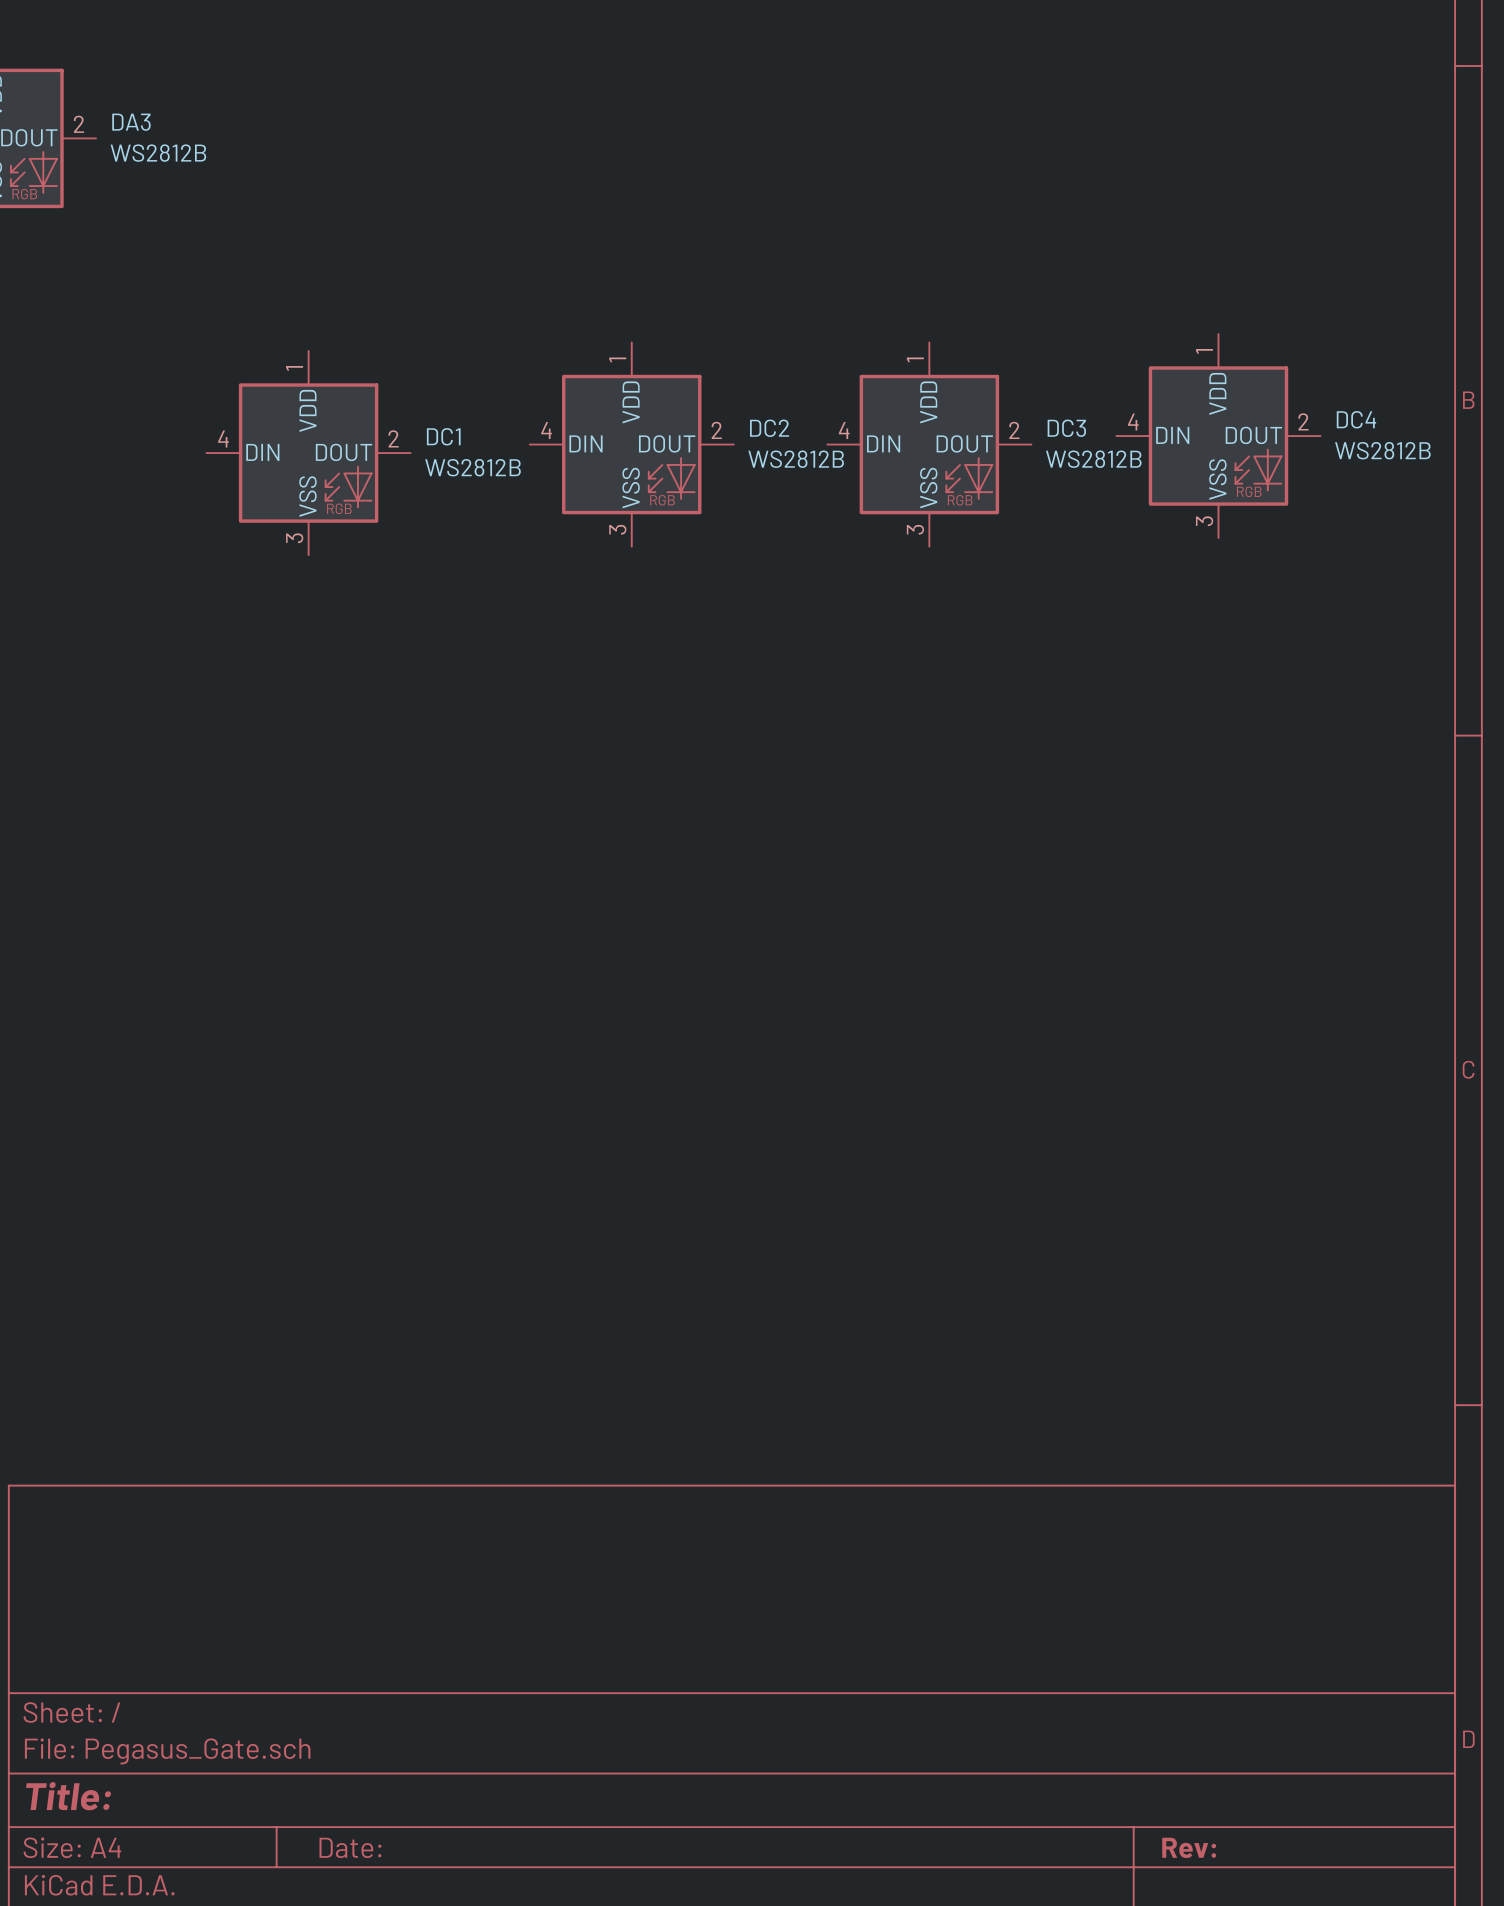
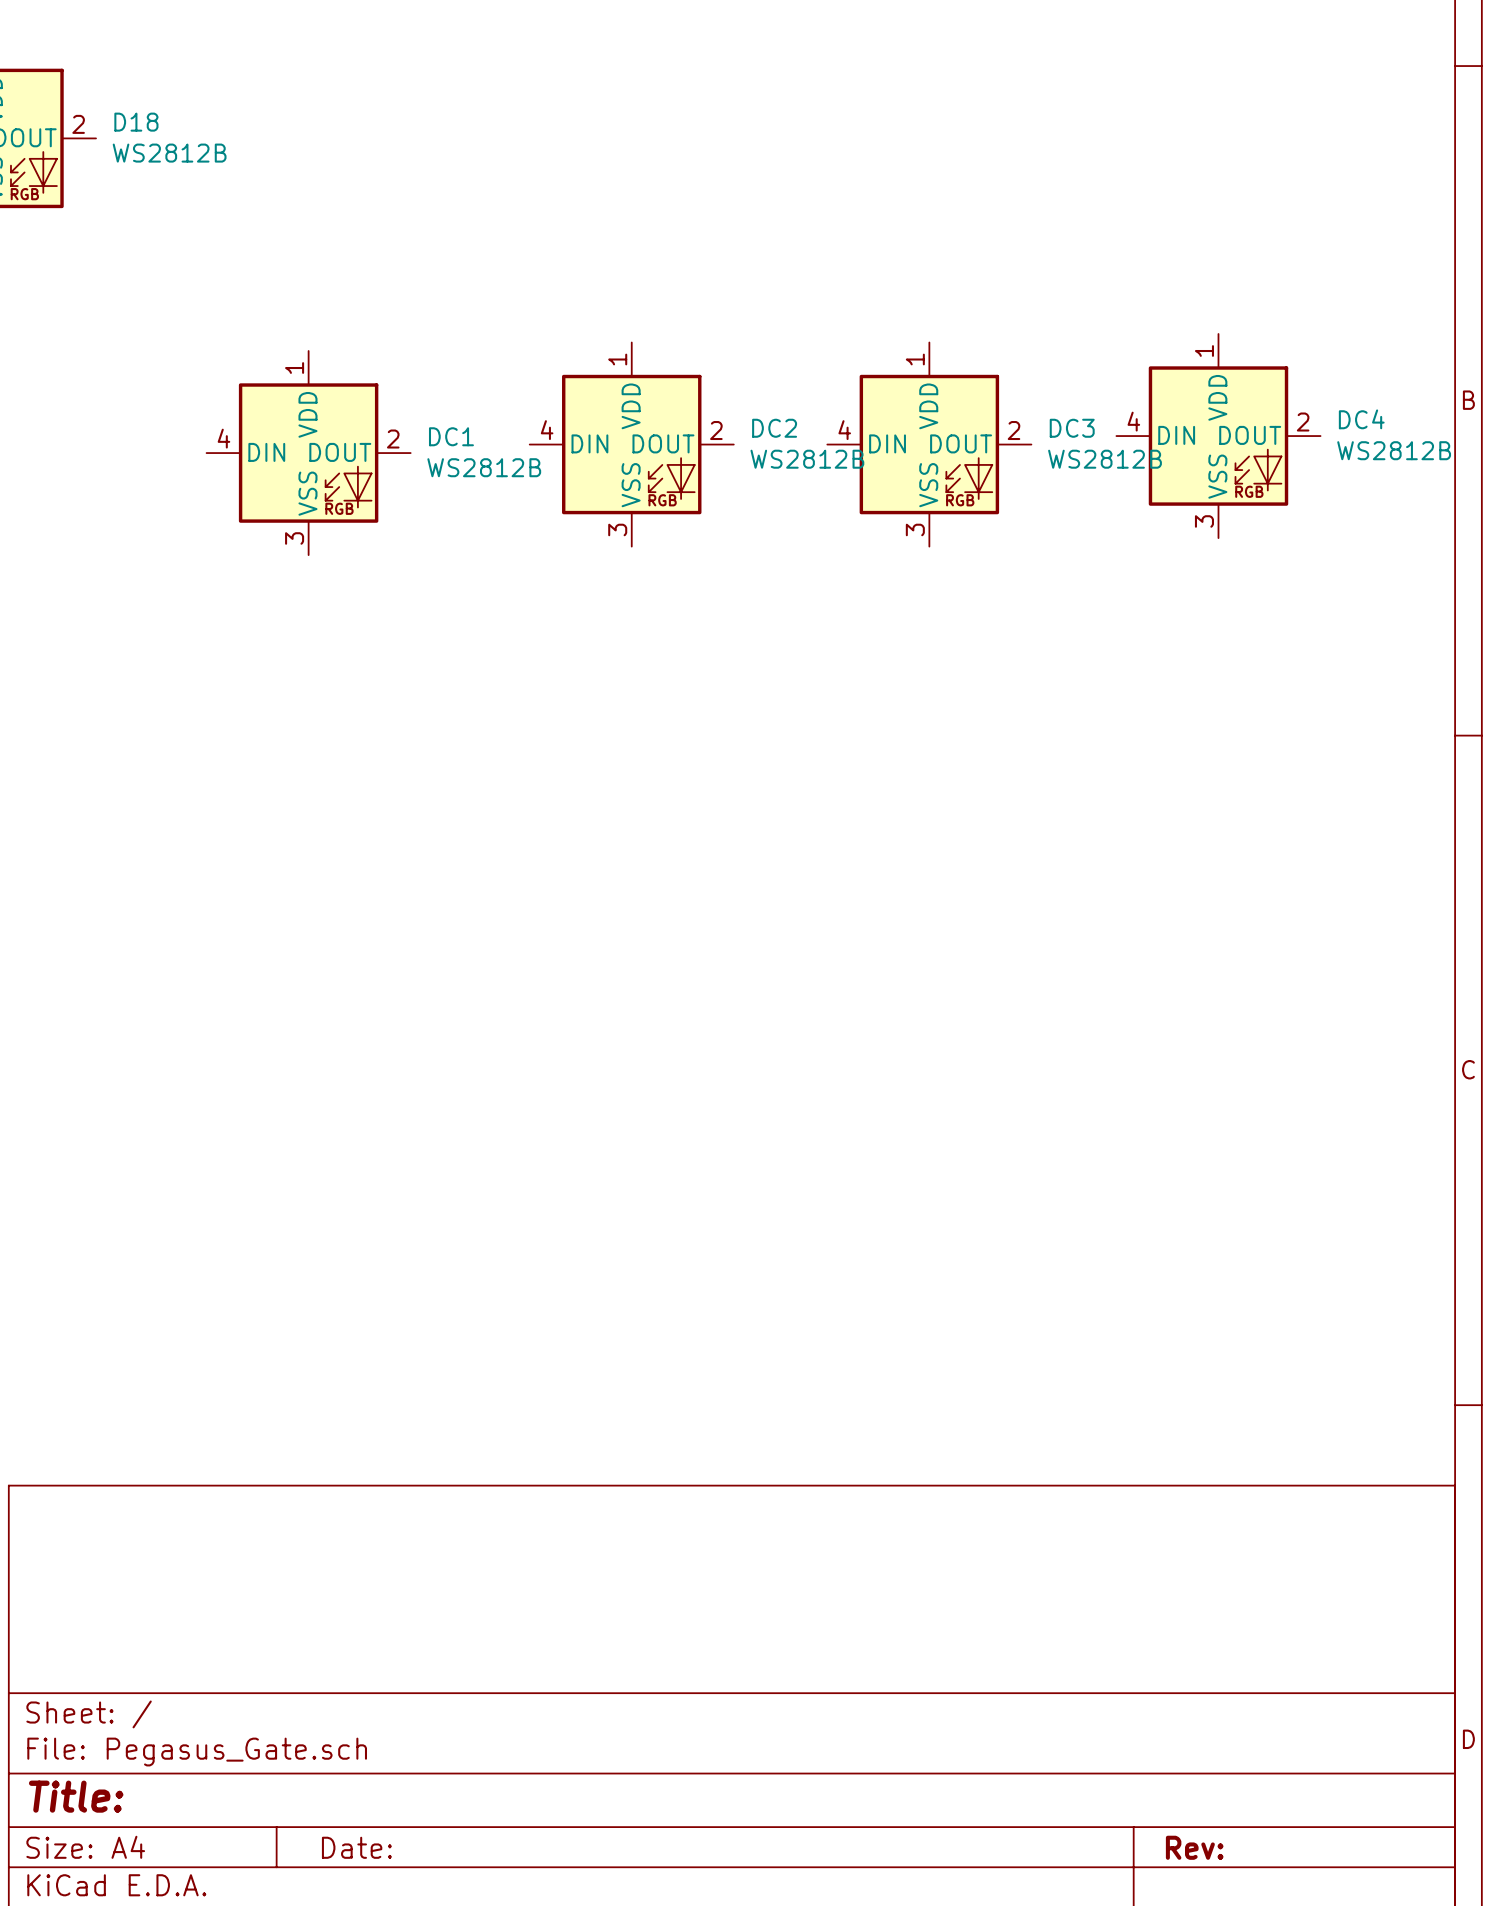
DA3 name: DA3 (131, 122) -> D18 (136, 122)

